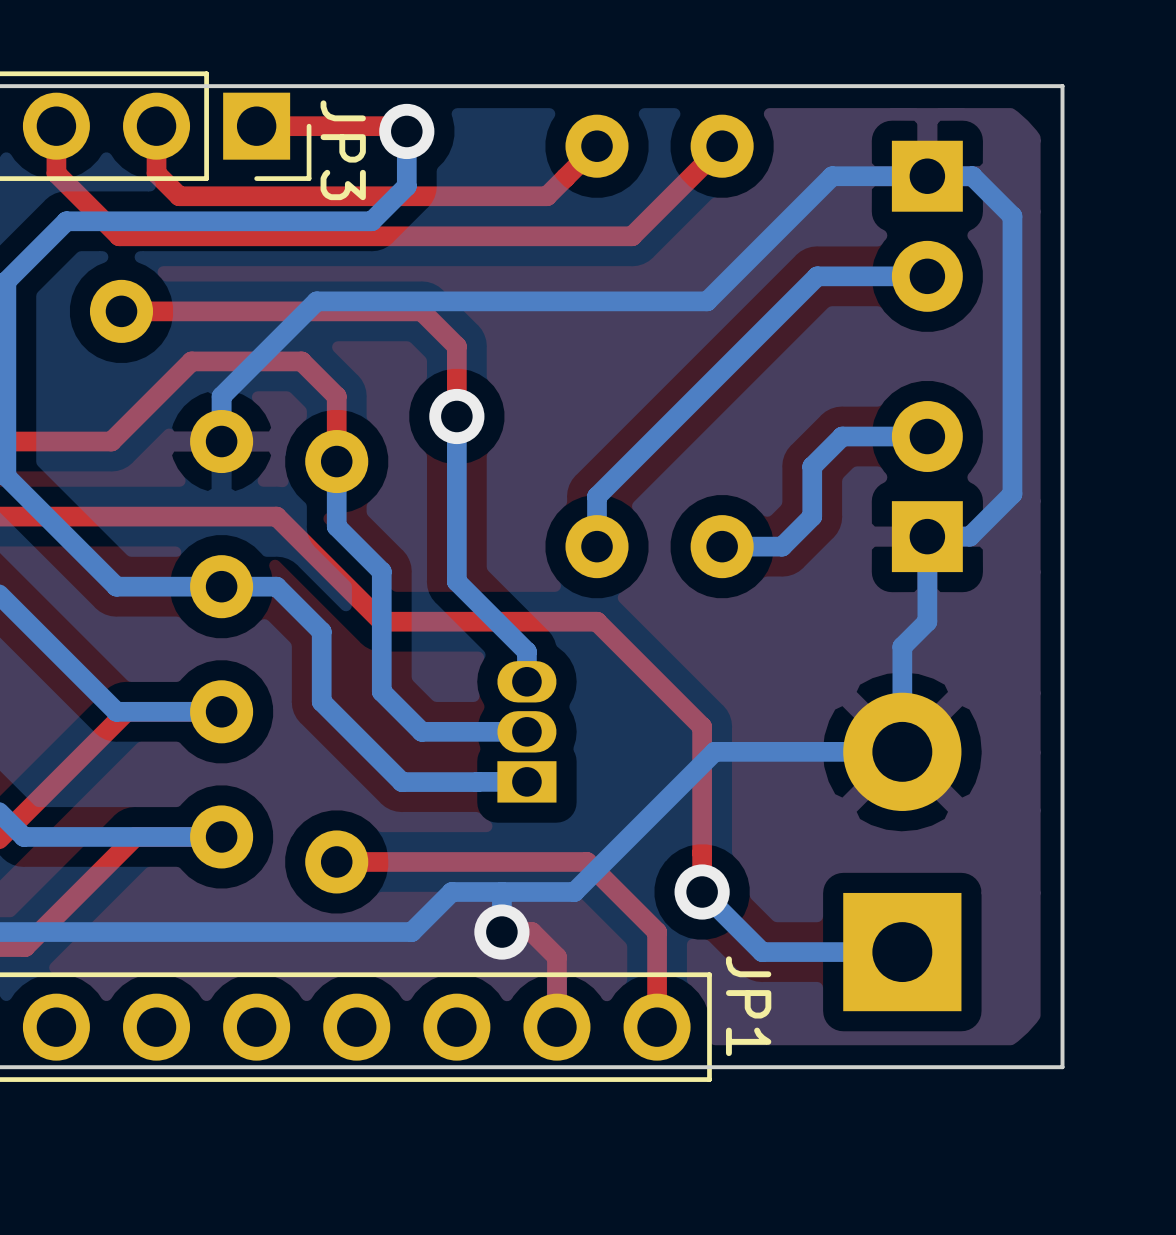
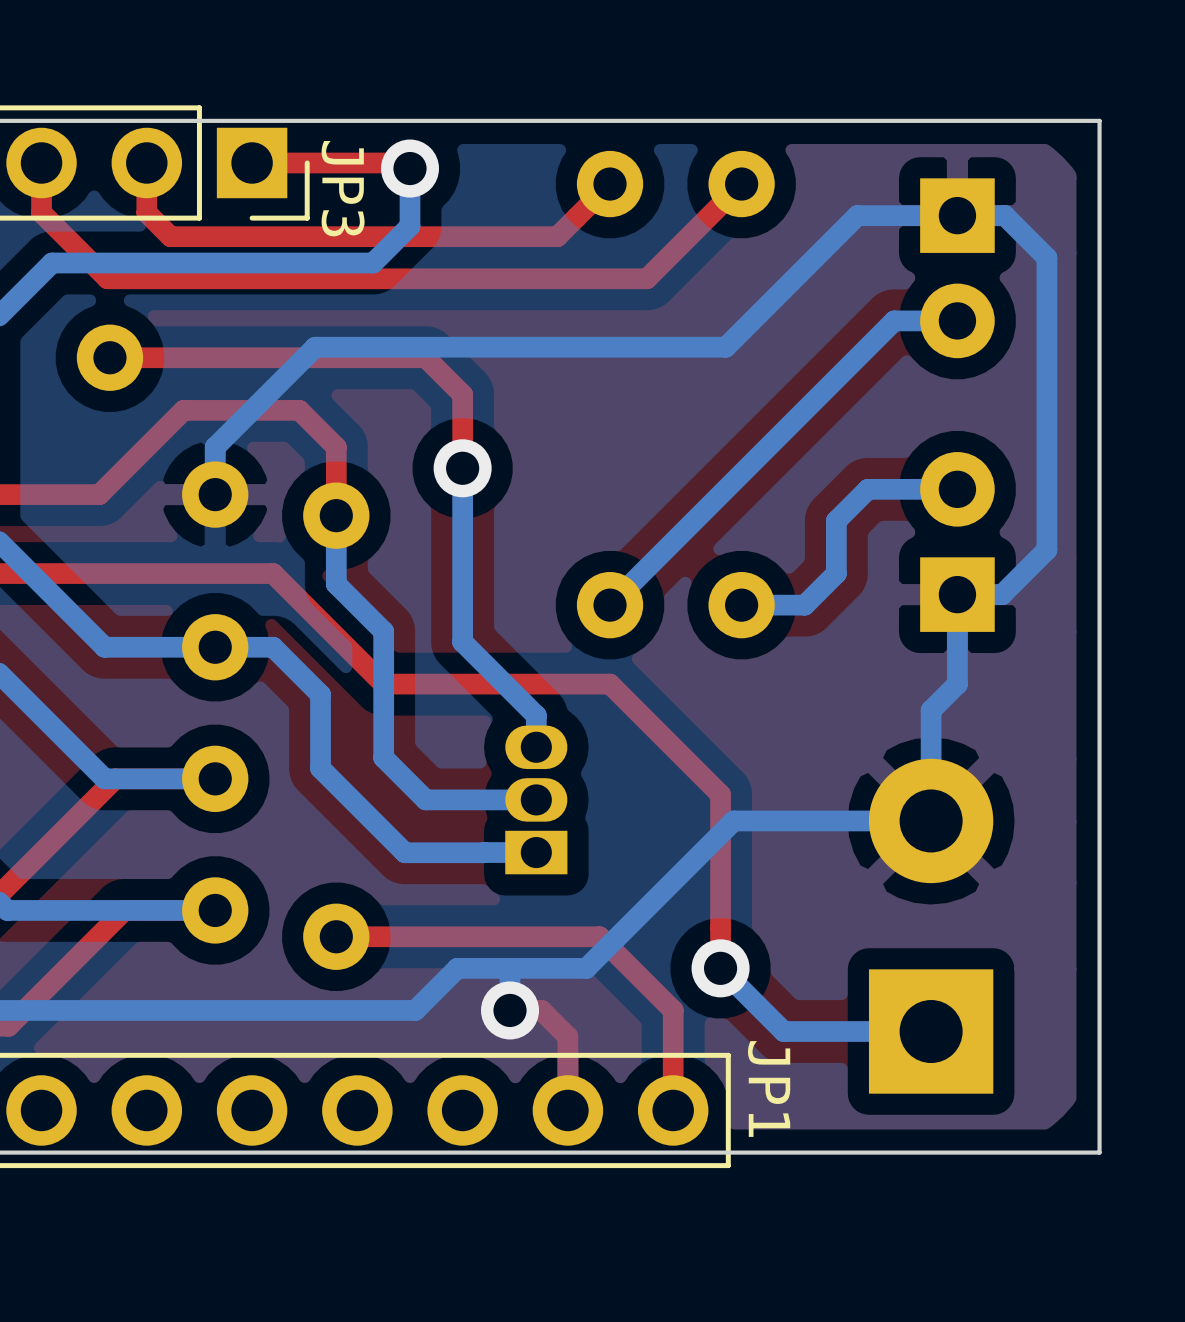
bottom track: (867, 276) (817, 276) (597, 496) (597, 546) -> (894, 320) (610, 605)

